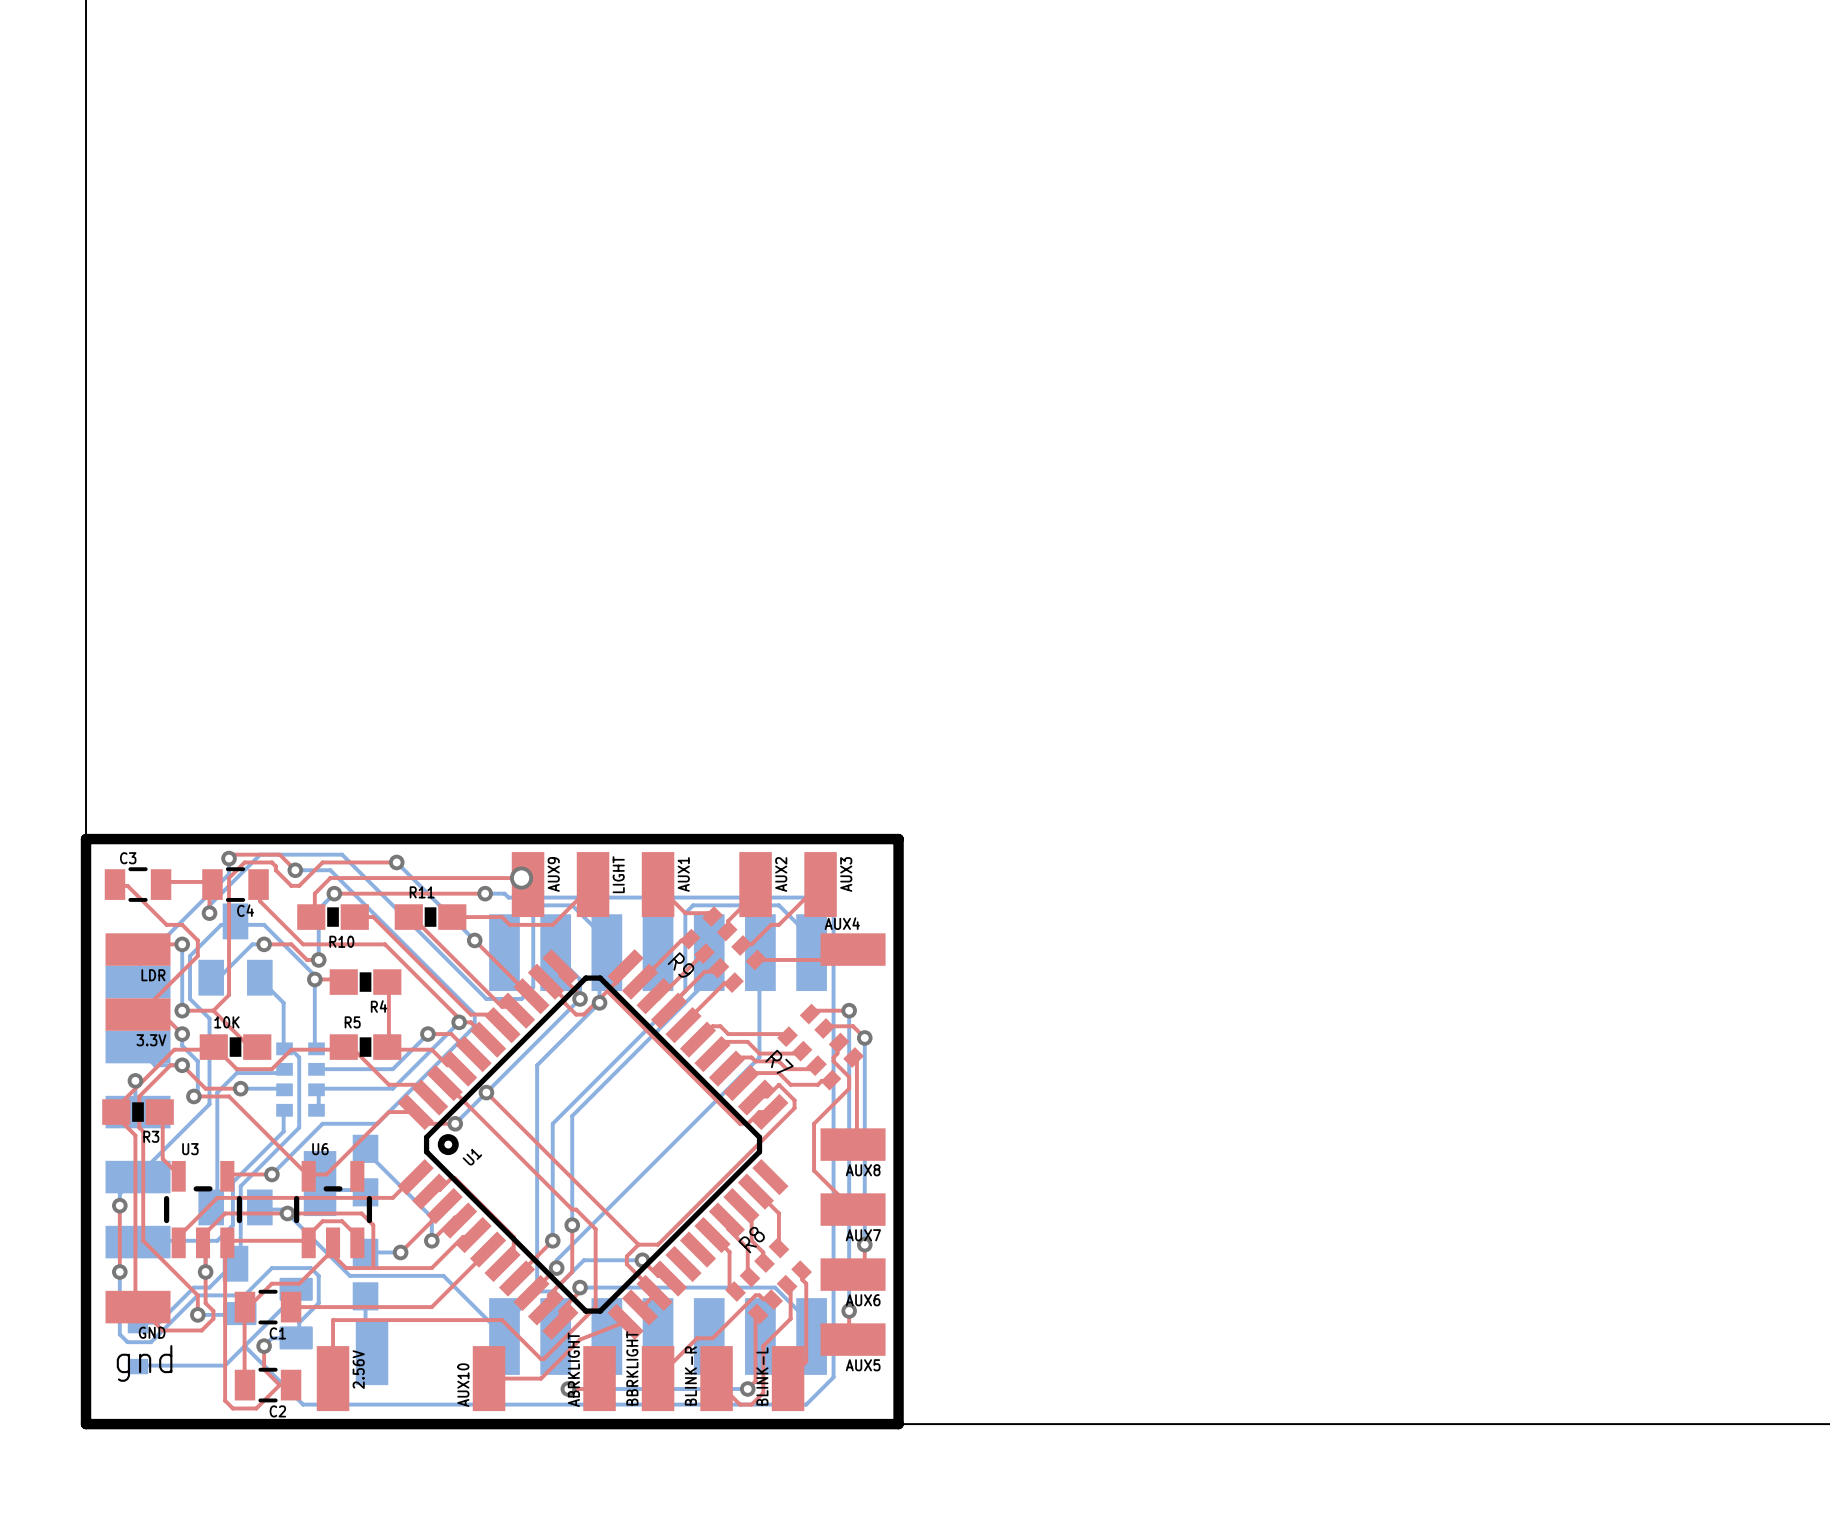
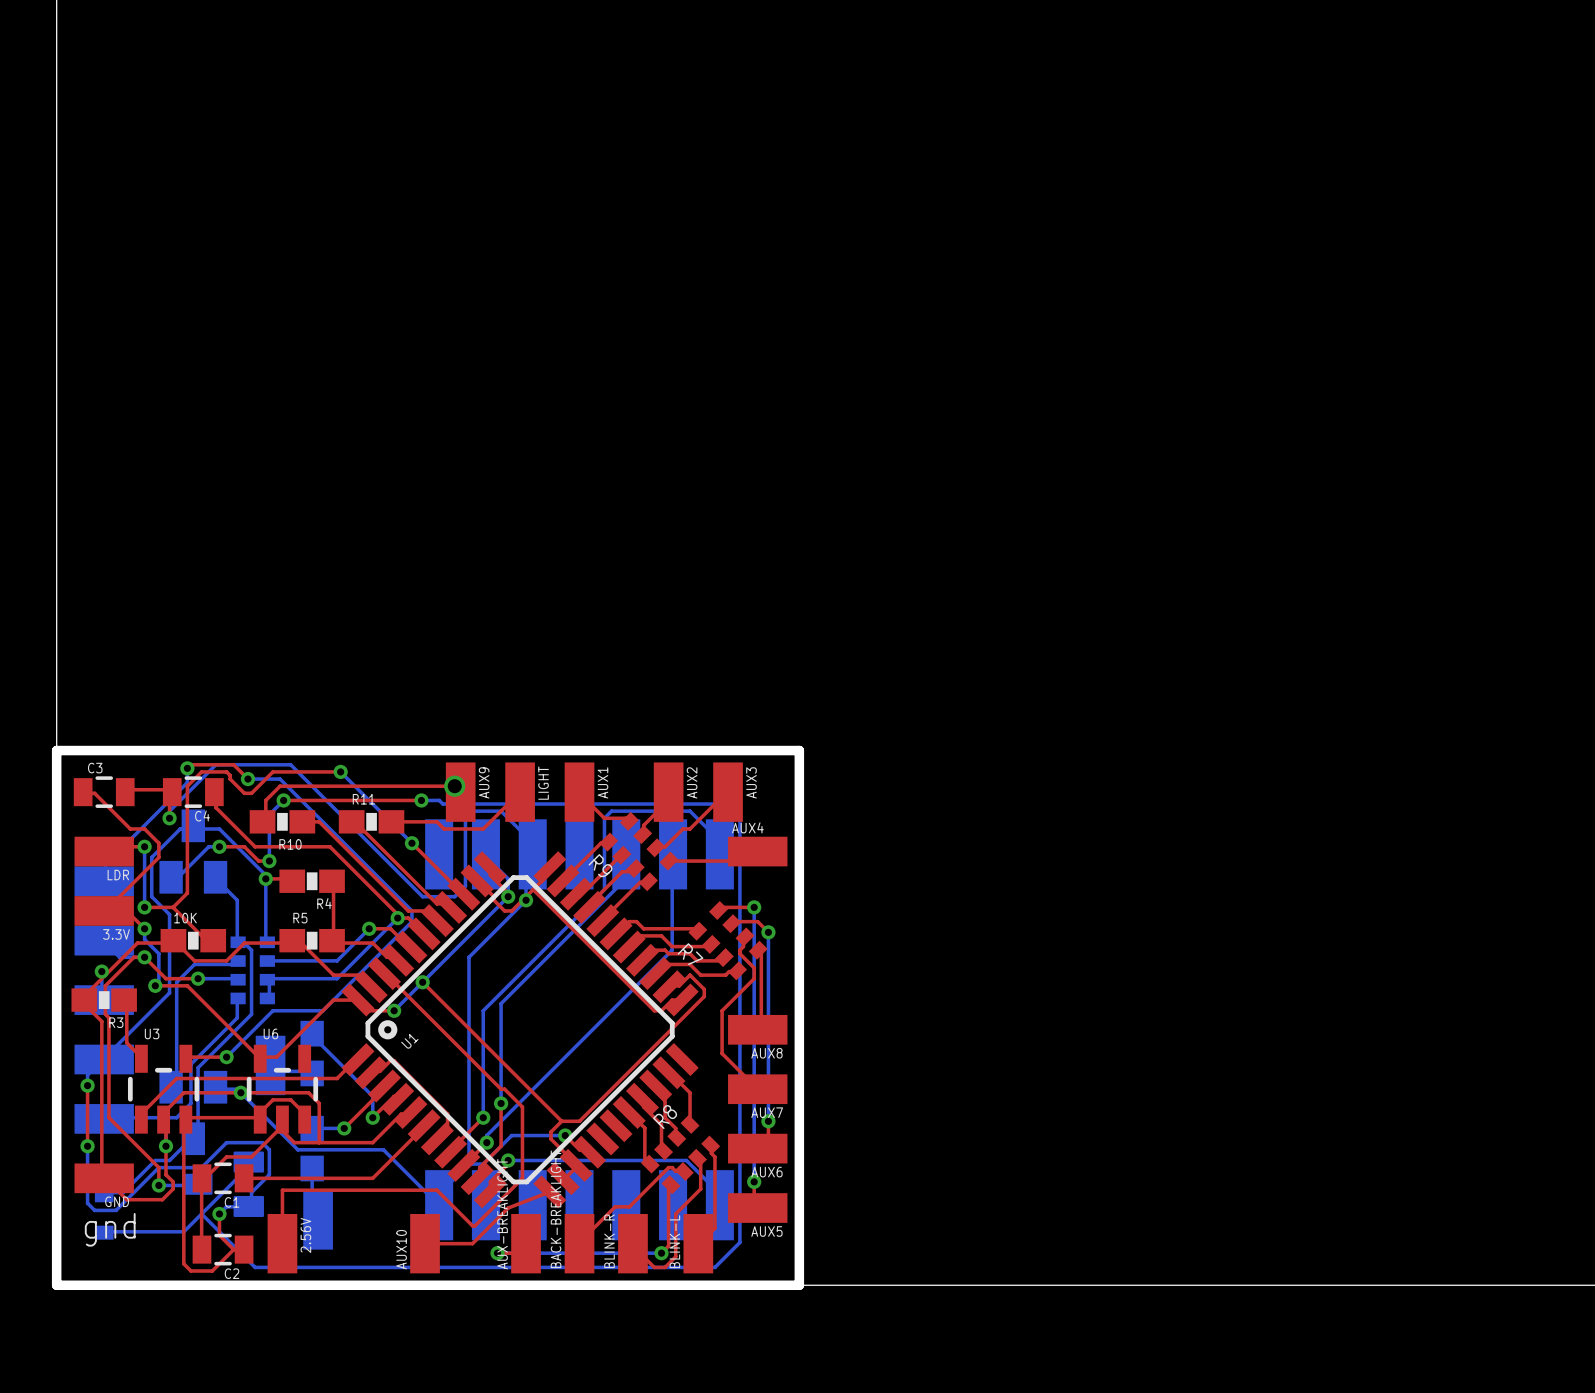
BBRKLIGHT name: BBRKLIGHT (632, 1368) -> BACK-BREAKLIGHT (556, 1209)
ABRKLIGHT name: ABRKLIGHT (573, 1369) -> AUX-BREAKLIGHT (502, 1214)

